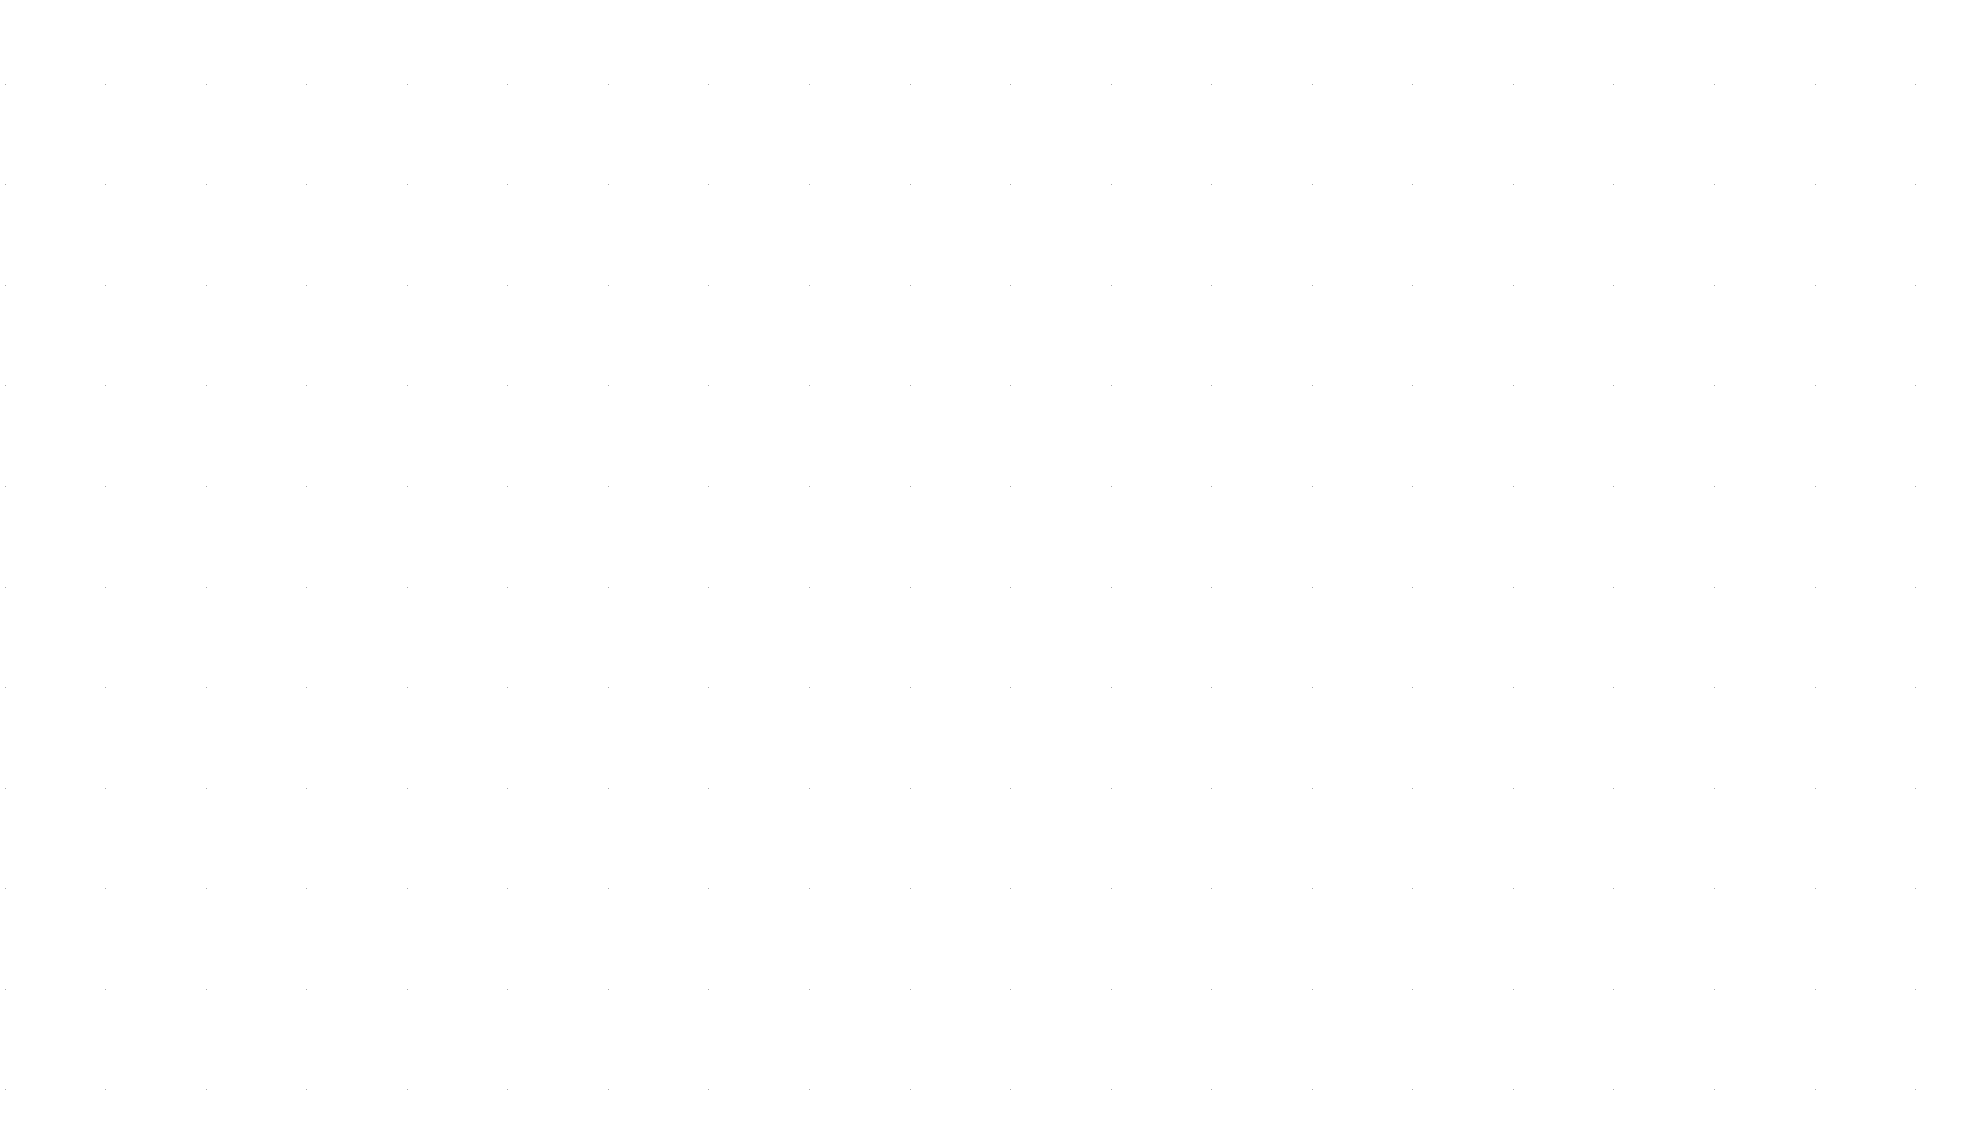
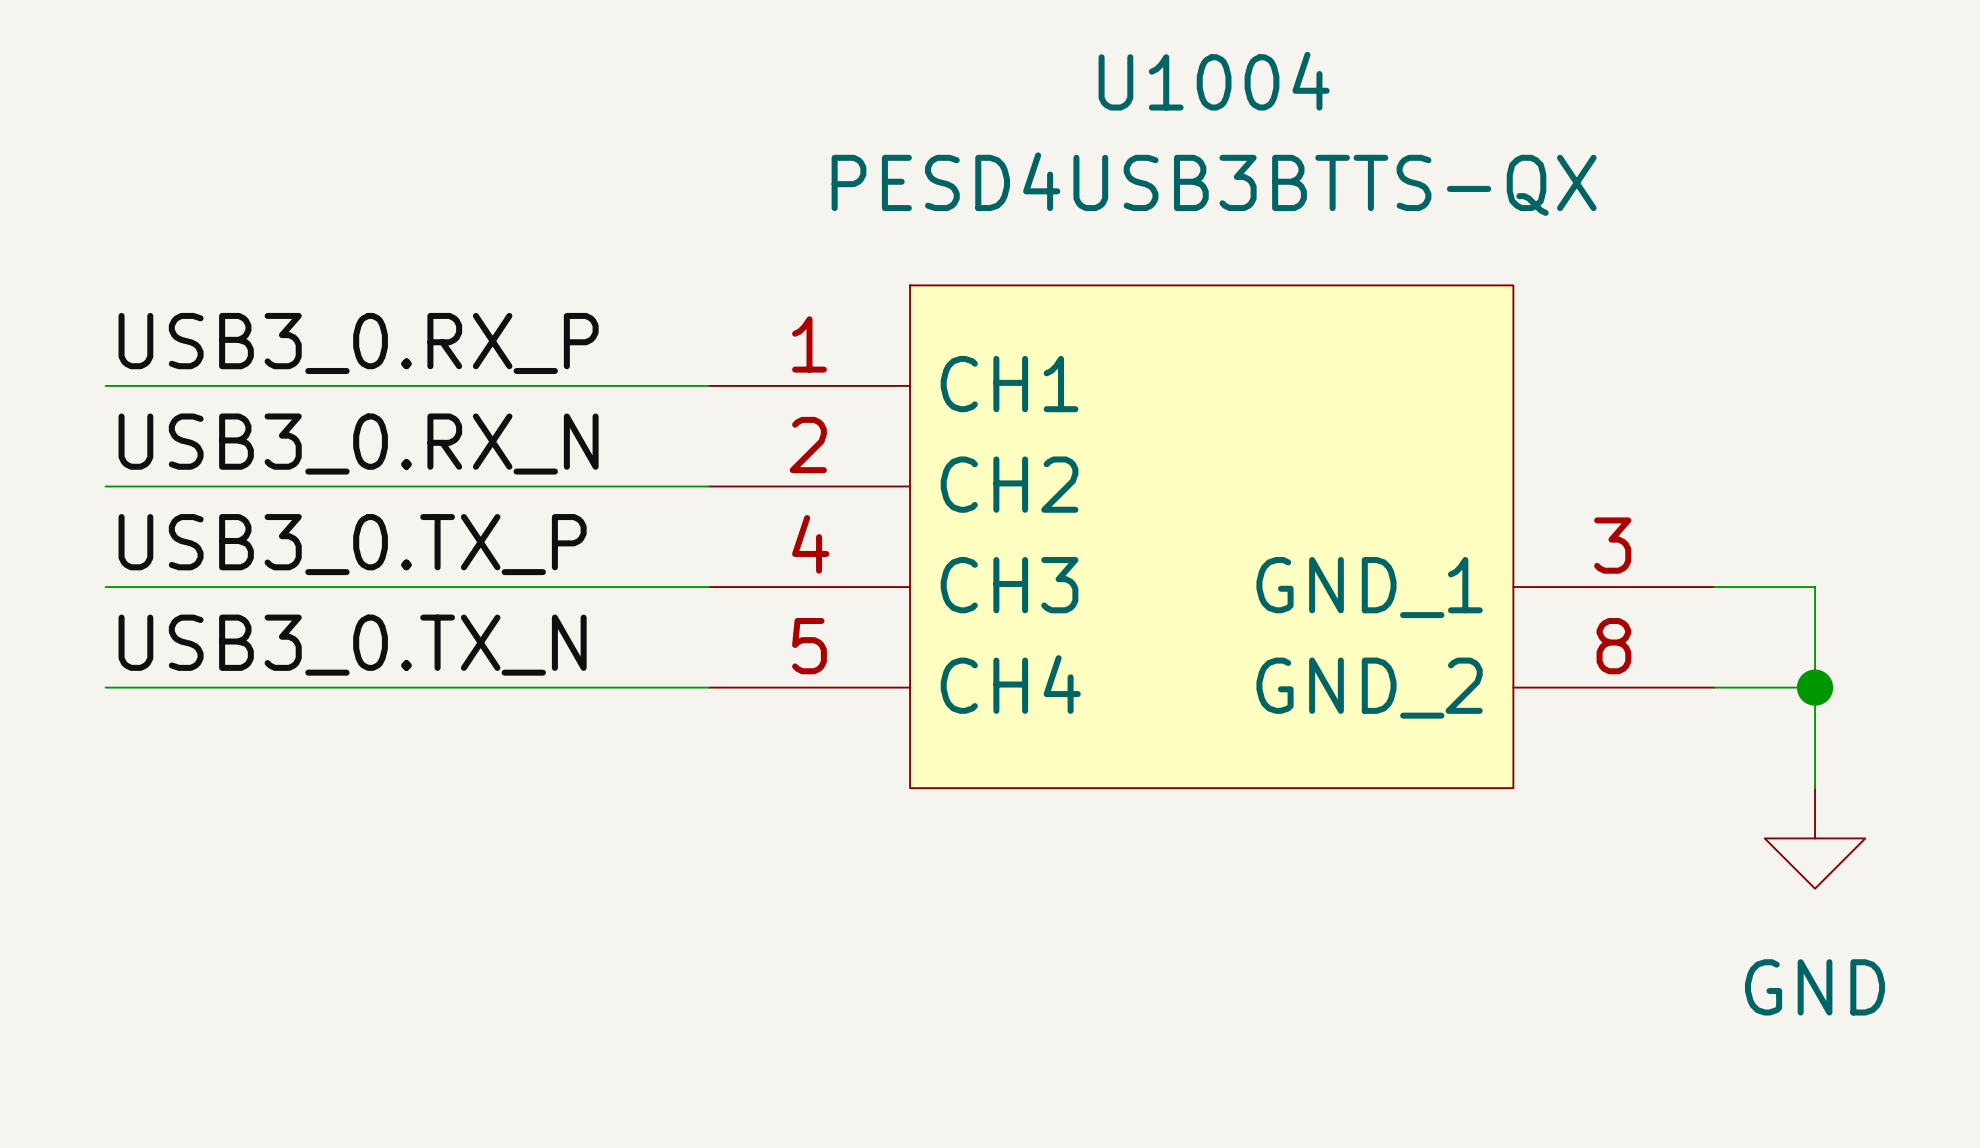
label: none -> USB3_0.RX_P (358, 343)
wire: none -> (105, 385) (708, 385)
label: none -> USB3_0.RX_N (358, 444)
wire: none -> (105, 486) (708, 486)
U1004: none -> PESD4USB3BTTS-QX (1211, 536)
label: none -> USB3_0.TX_P (352, 544)
wire: none -> (105, 587) (708, 587)
wire: none -> (1714, 587) (1815, 587) (1815, 788)
label: none -> USB3_0.TX_N (352, 645)
wire: none -> (105, 687) (708, 687)
wire: none -> (1714, 687) (1815, 687)
junction: none -> (1815, 687)
power symbol: none -> GND (1815, 838)

